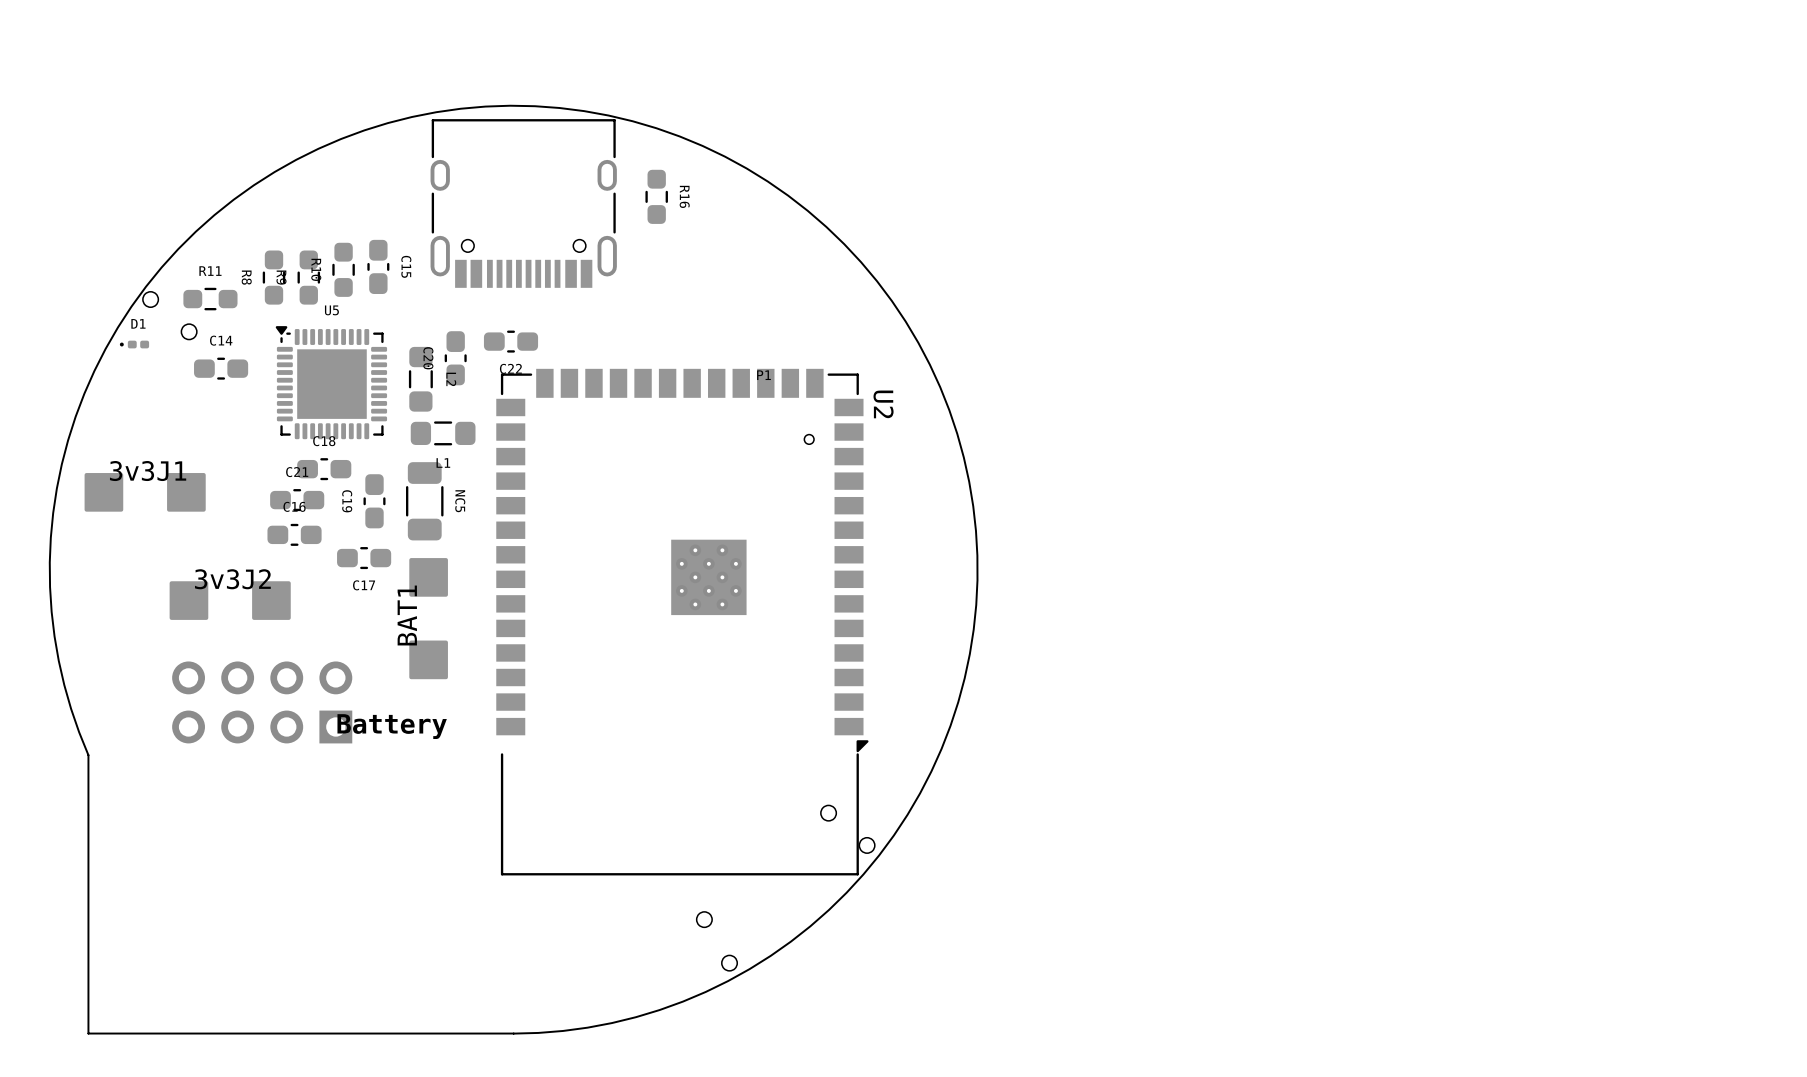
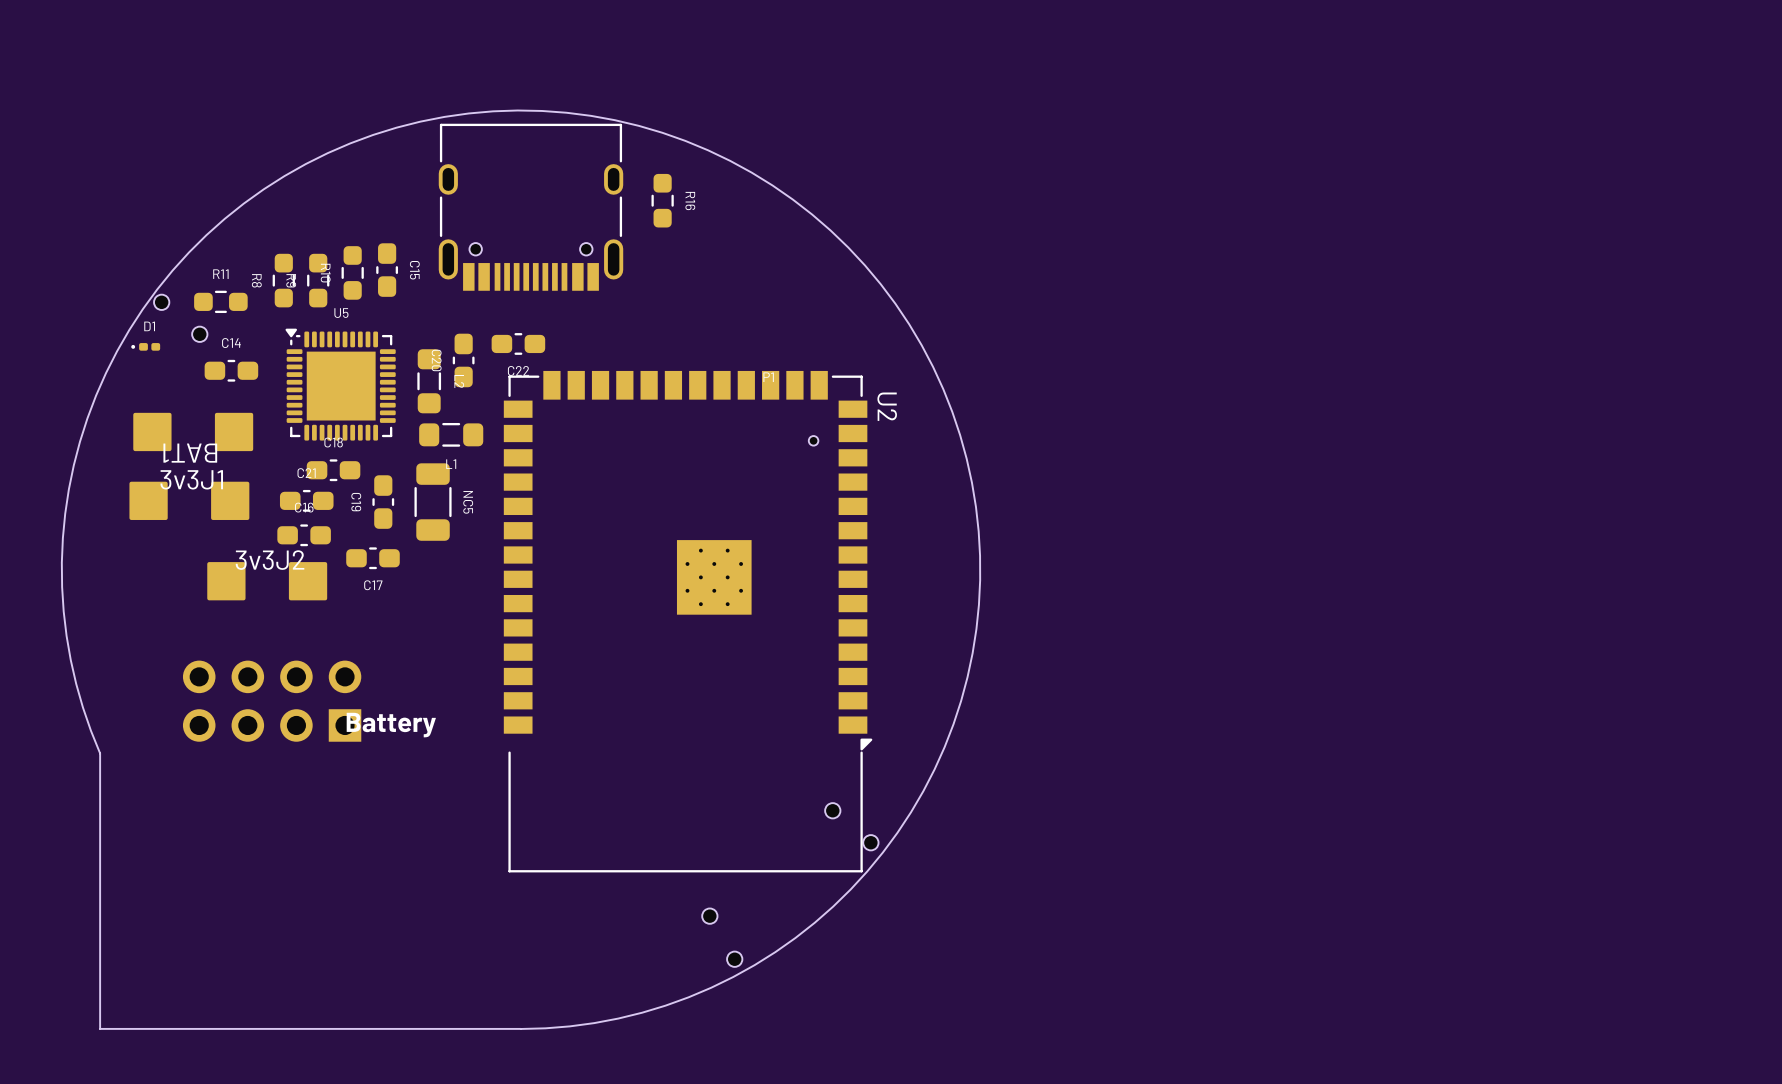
3v3J1 position: (145, 492) -> (189, 500)
3v3J2 position: (230, 600) -> (267, 581)
BAT1 rotation: 0° (428, 618) -> 90° clockwise (193, 431)
BAT1 position: (428, 618) -> (193, 431)

